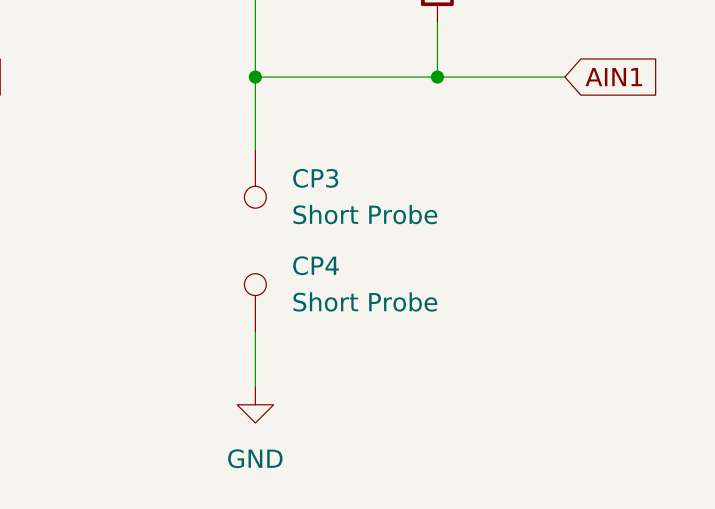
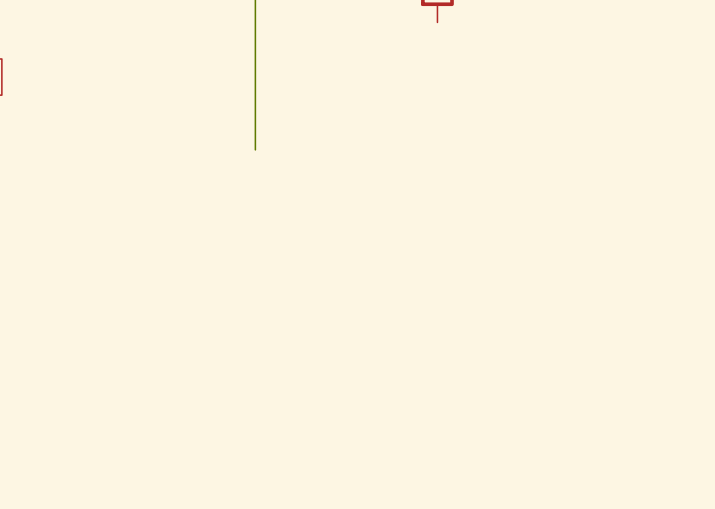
wire: (437, 22) (437, 77) -> none
wire: (255, 77) (564, 77) -> none
junction: (255, 77) -> none
junction: (437, 77) -> none
global label: AIN1 (613, 77) -> none
CP3: Short Probe (255, 179) -> none
CP4: Short Probe (255, 302) -> none
wire: (255, 331) (255, 386) -> none
power symbol: GND (255, 404) -> none

